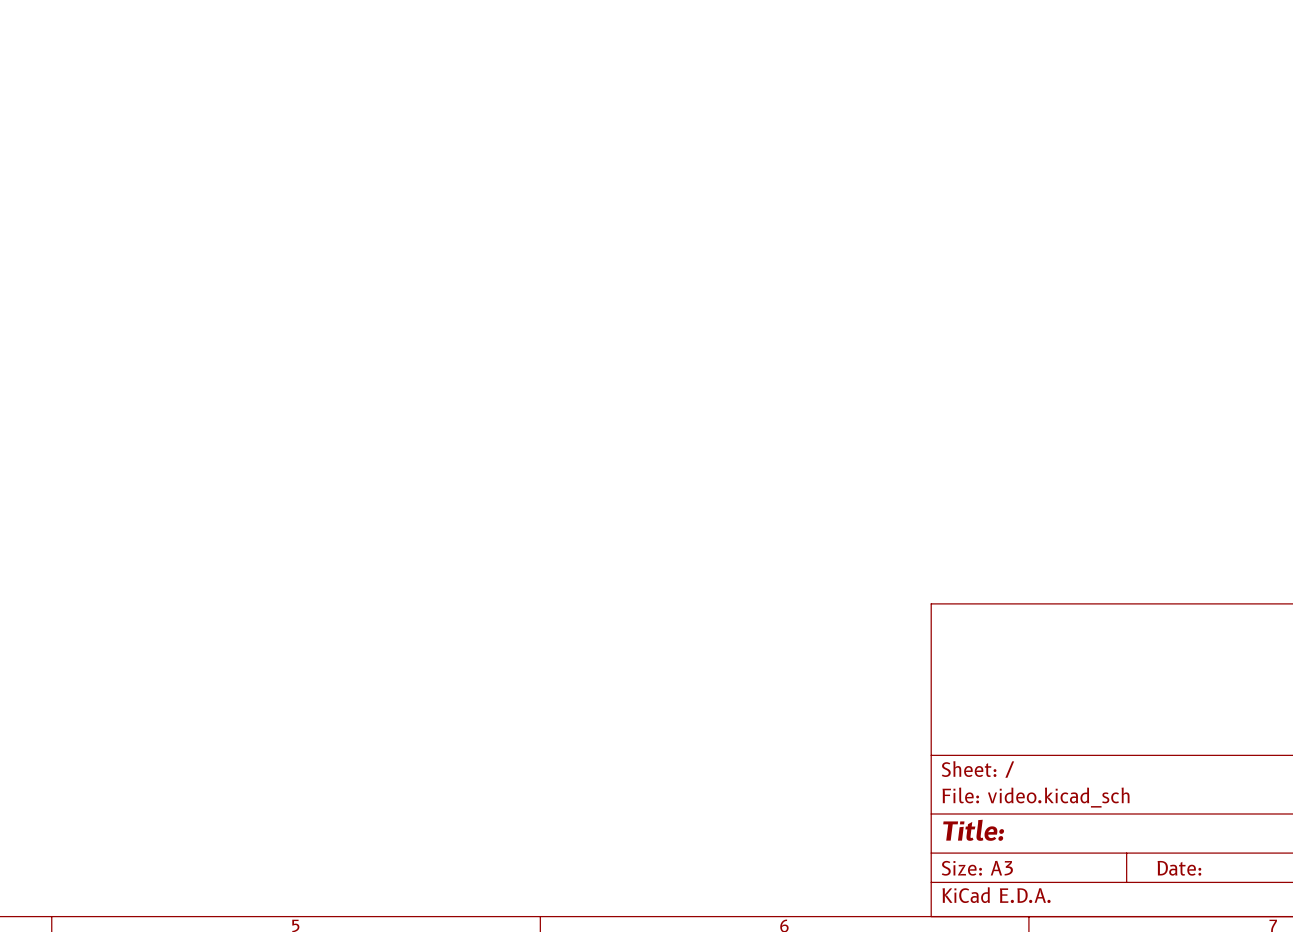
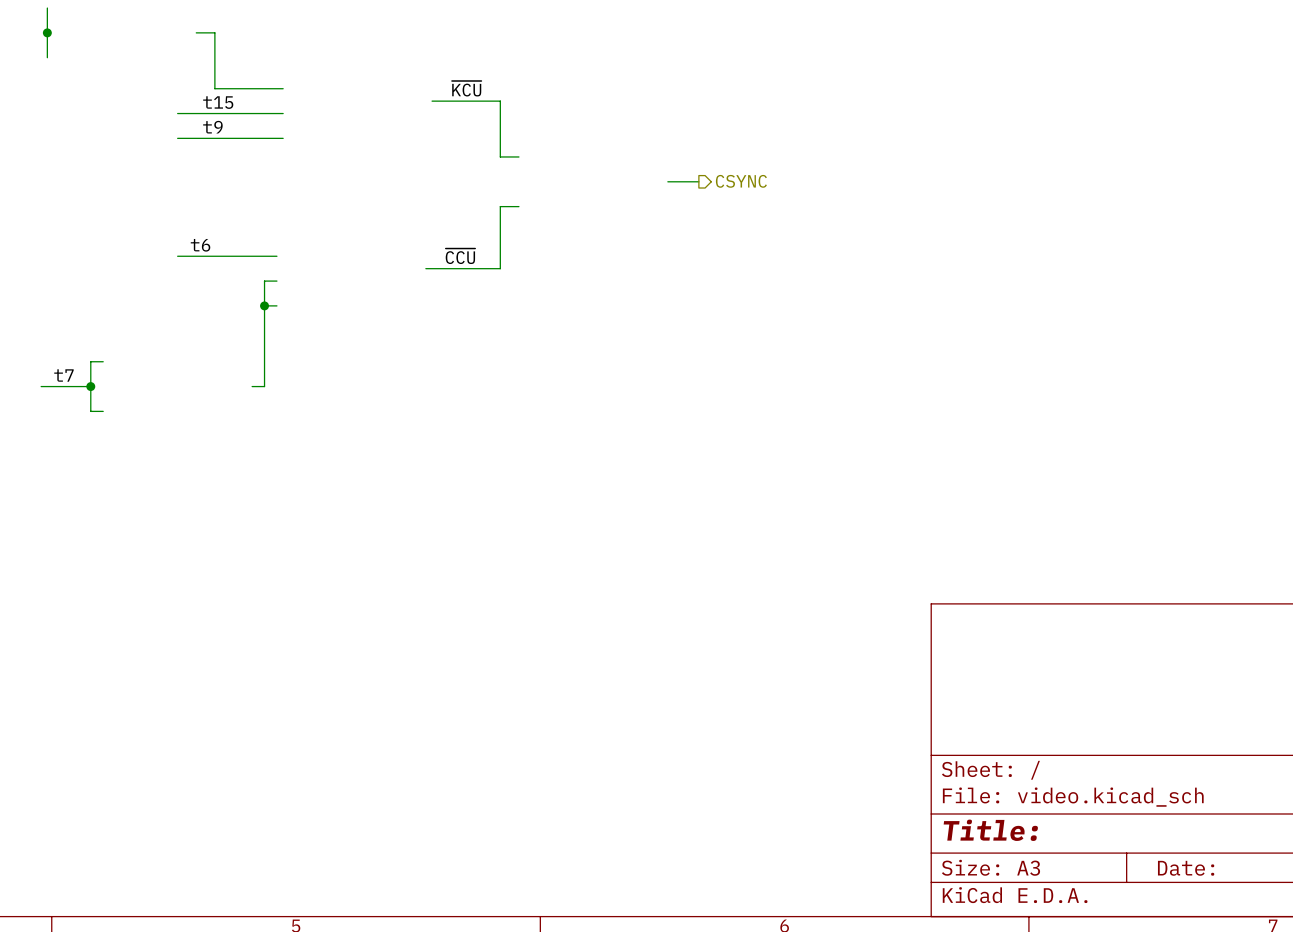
wire: none -> (47, 8) (47, 57)
junction: none -> (47, 32)
wire: none -> (196, 32) (214, 32) (214, 88) (283, 88)
label: none -> ~{KCU} (466, 88)
wire: none -> (432, 101) (500, 101) (500, 156) (518, 156)
label: none -> t15 (218, 102)
wire: none -> (177, 113) (283, 113)
label: none -> t9 (212, 127)
wire: none -> (177, 138) (283, 138)
wire: none -> (667, 181) (698, 181)
hierarchical label: none -> CSYNC (741, 181)
wire: none -> (518, 206) (500, 206) (500, 268) (425, 268)
label: none -> t6 (200, 245)
wire: none -> (177, 256) (276, 256)
label: none -> ~{CCU} (460, 256)
wire: none -> (276, 281) (264, 281) (264, 386) (252, 386)
wire: none -> (264, 305) (276, 305)
junction: none -> (264, 305)
wire: none -> (103, 361) (90, 361) (90, 411) (103, 411)
label: none -> t7 (63, 375)
wire: none -> (41, 386) (90, 386)
junction: none -> (90, 386)

